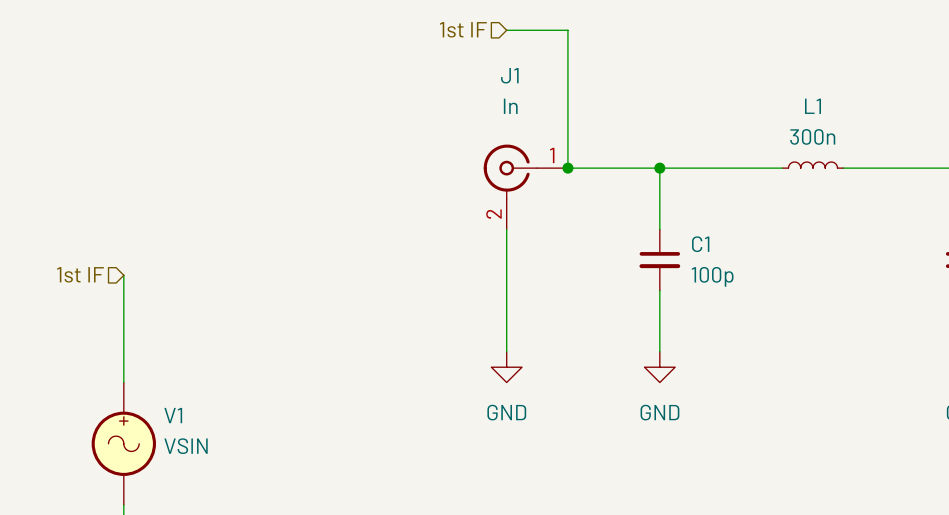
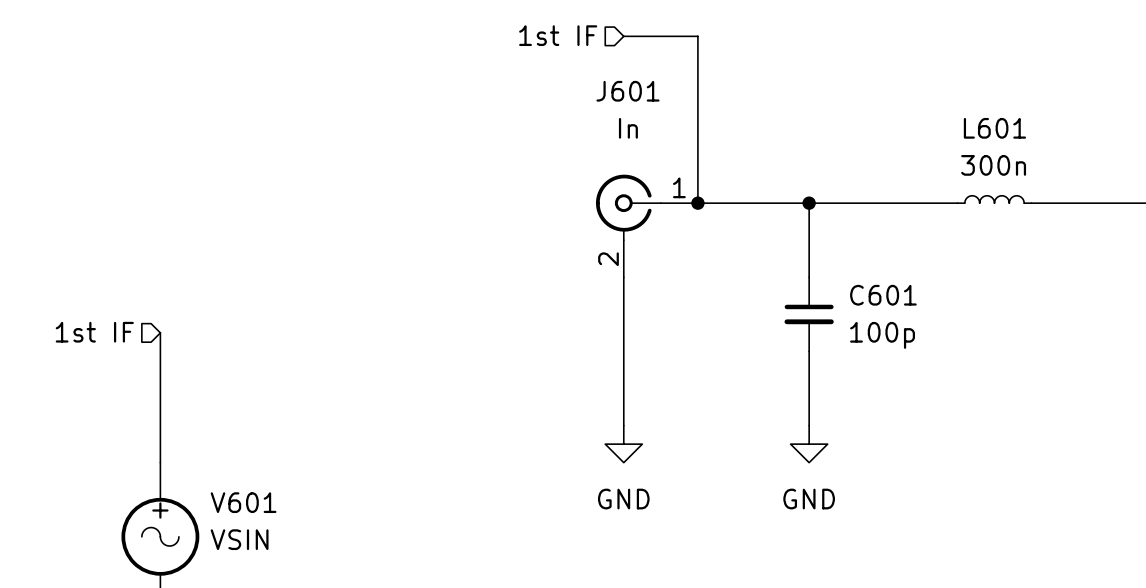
J1 name: J1 (509, 75) -> J601 (627, 91)
L1 name: L1 (813, 106) -> L601 (994, 128)
C1 name: C1 (700, 244) -> C601 (883, 295)
V1 name: V1 (173, 415) -> V601 (243, 502)

